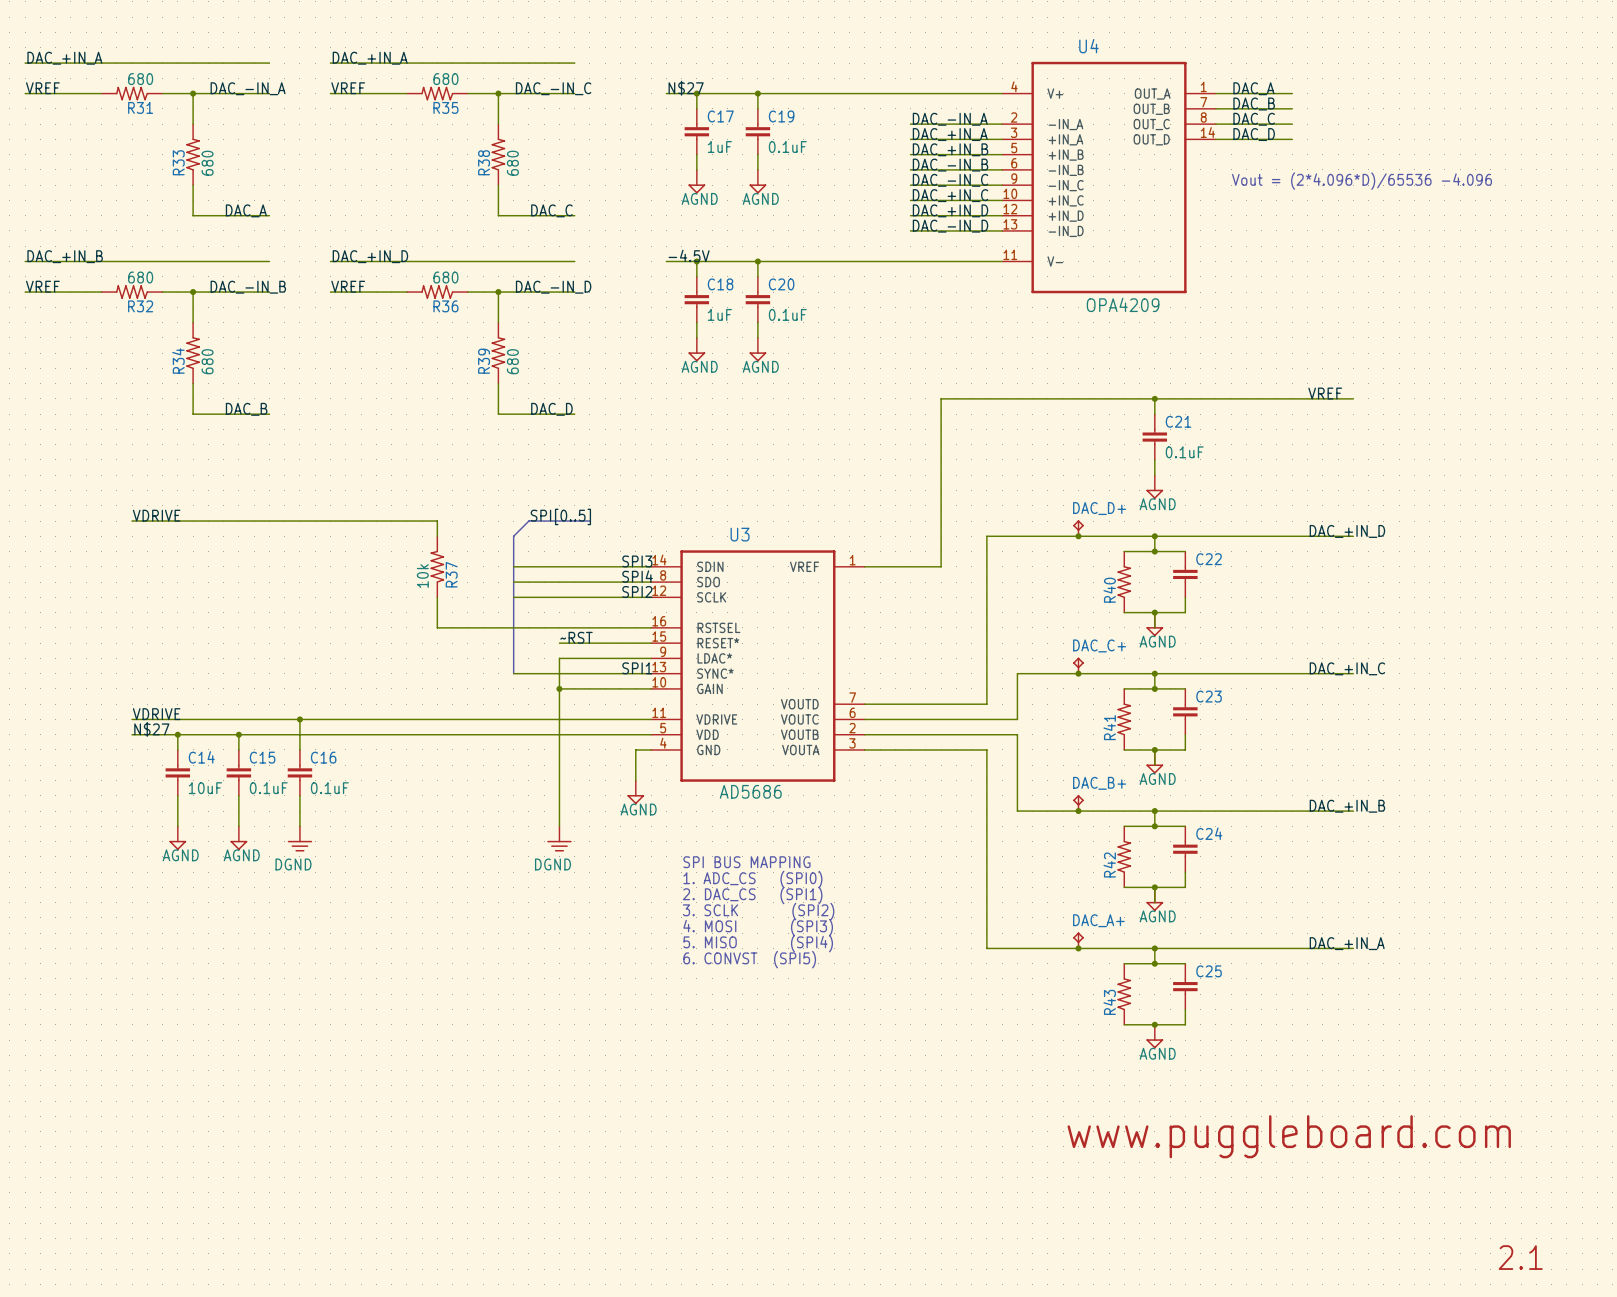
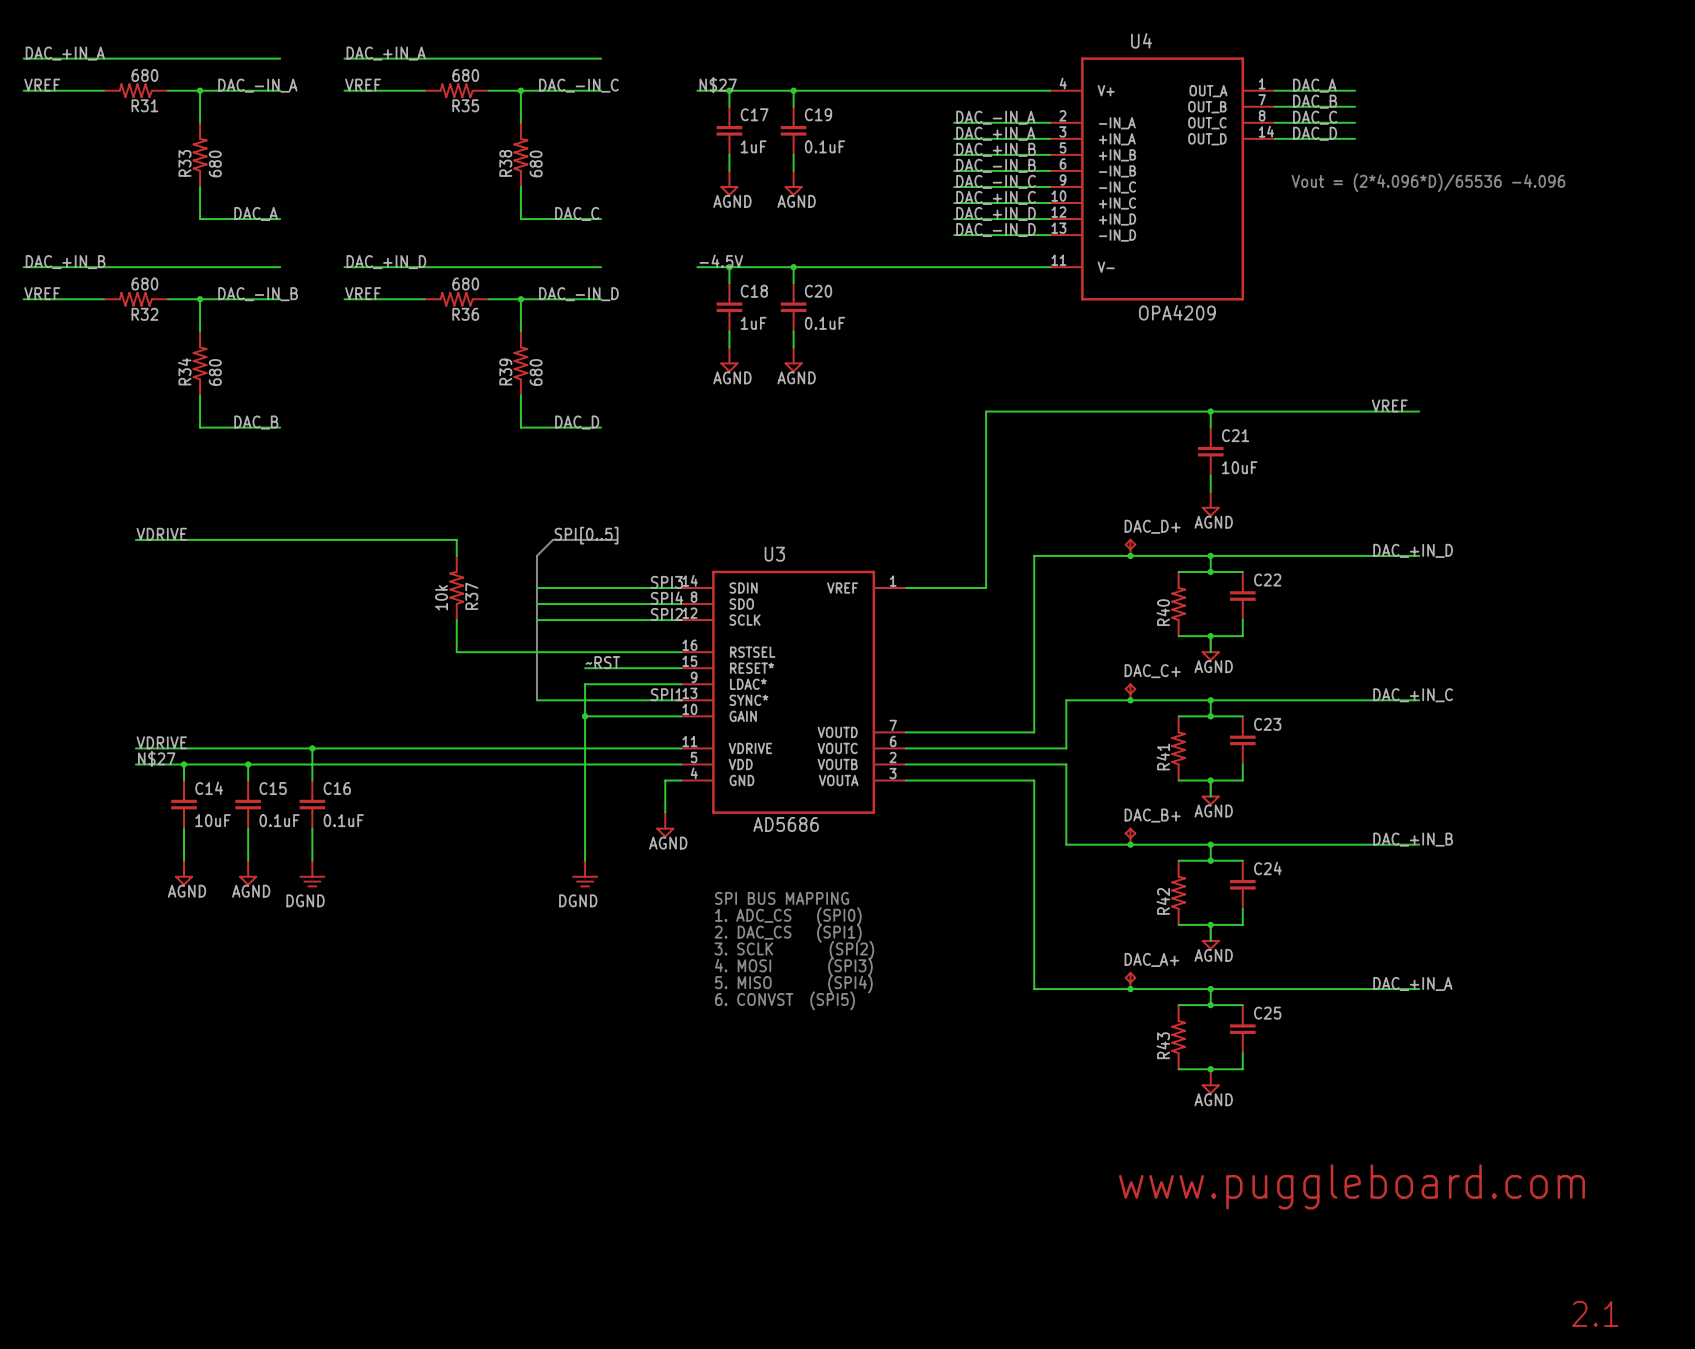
C21 value: 0.1uF (1184, 452) -> 10uF (1239, 467)

